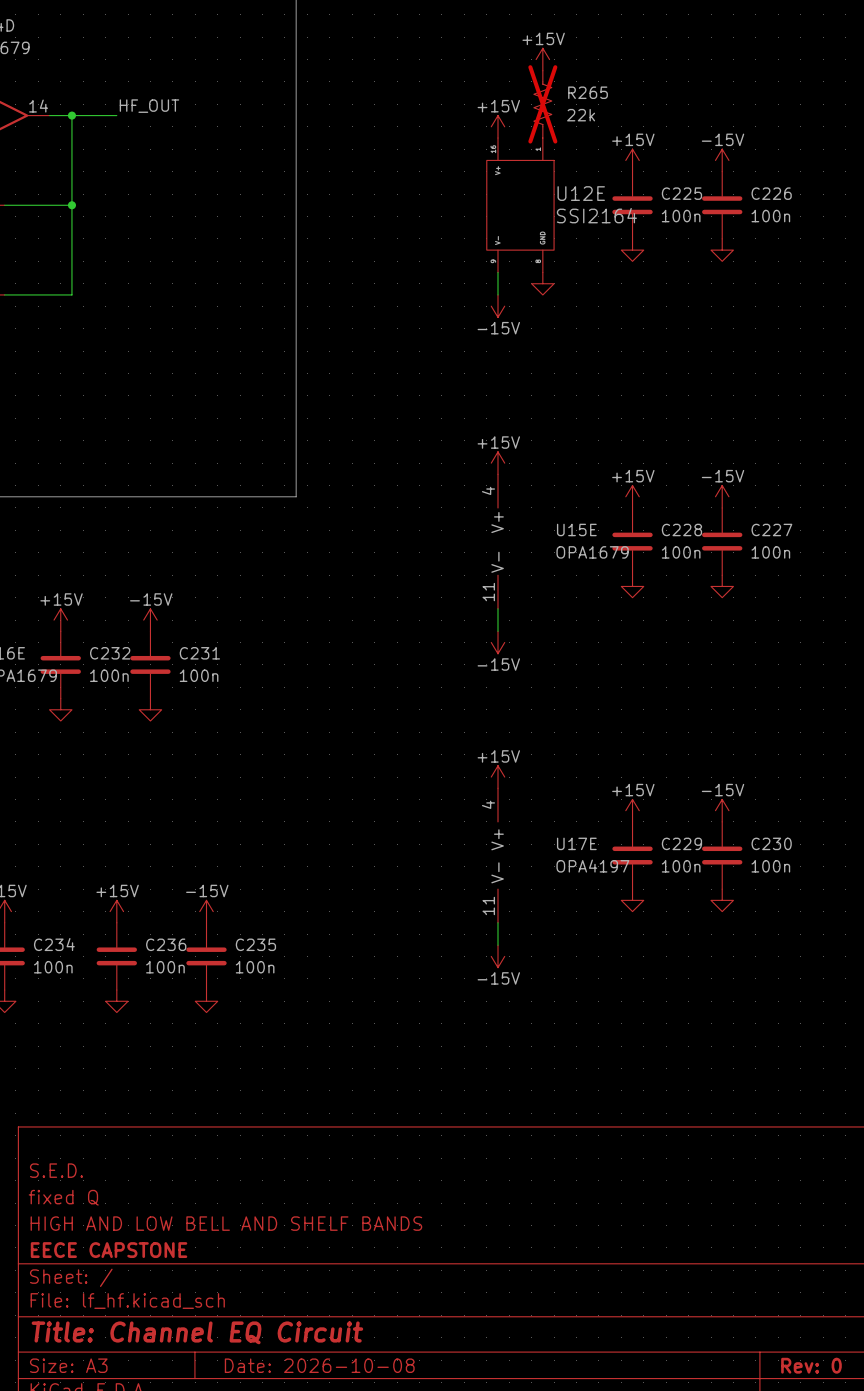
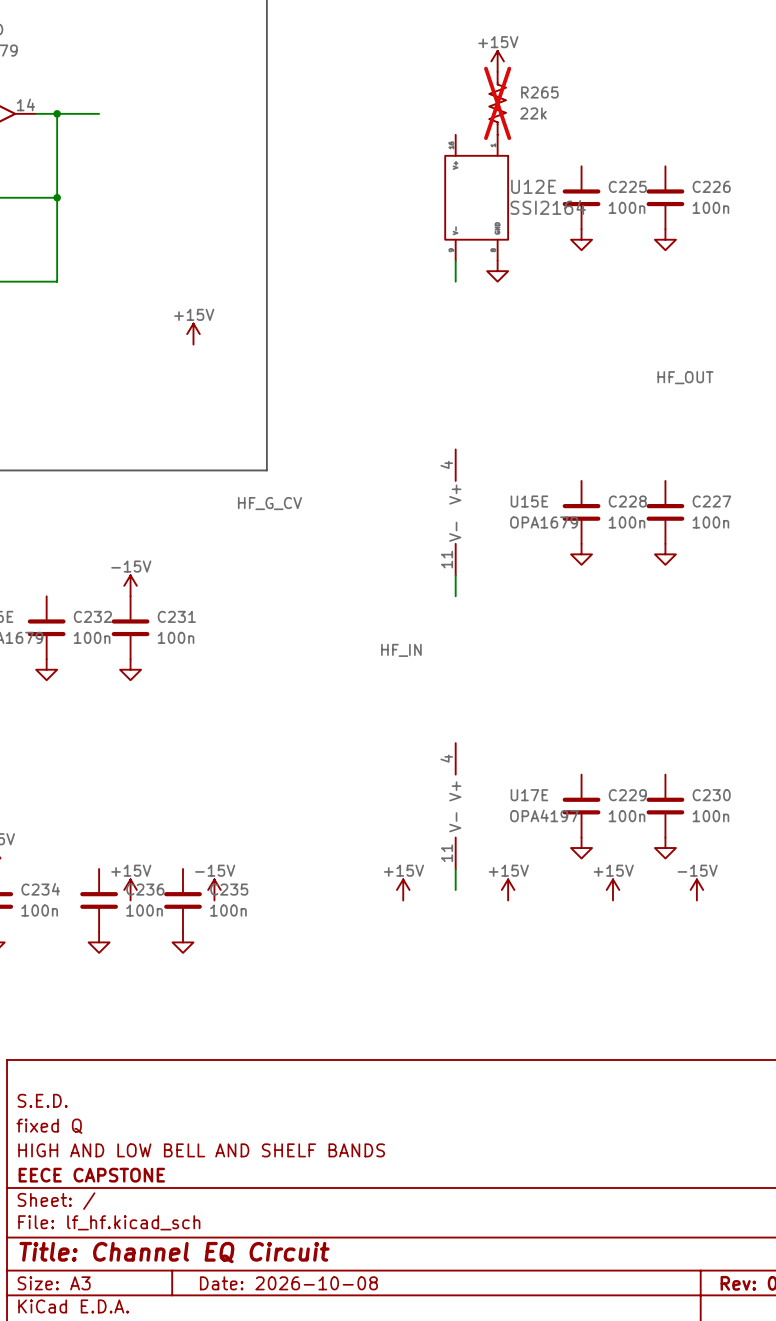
label: HF_OUT (149, 106) -> none
power symbol: +15V (497, 126) -> none
power symbol: +15V (632, 160) -> none
power symbol: -15V (722, 160) -> none
power symbol: -15V (497, 306) -> none
power symbol: none -> +15V (193, 334)
label: none -> HF_OUT (685, 377)
power symbol: +15V (497, 463) -> none
power symbol: +15V (632, 496) -> none
power symbol: -15V (722, 496) -> none
label: none -> HF_G_CV (269, 503)
power symbol: +15V (60, 620) -> none
power symbol: -15V (497, 642) -> none
label: none -> HF_IN (401, 650)
power symbol: +15V (497, 777) -> none
power symbol: +15V (632, 810) -> none
power symbol: -15V (722, 810) -> none
power symbol position: +15V (116, 911) -> +15V (130, 889)
power symbol position: -15V (206, 911) -> -15V (214, 889)
power symbol: none -> +15V (403, 889)
power symbol: none -> +15V (508, 889)
power symbol: none -> +15V (613, 889)
power symbol: none -> -15V (696, 889)
power symbol: -15V (497, 956) -> none

